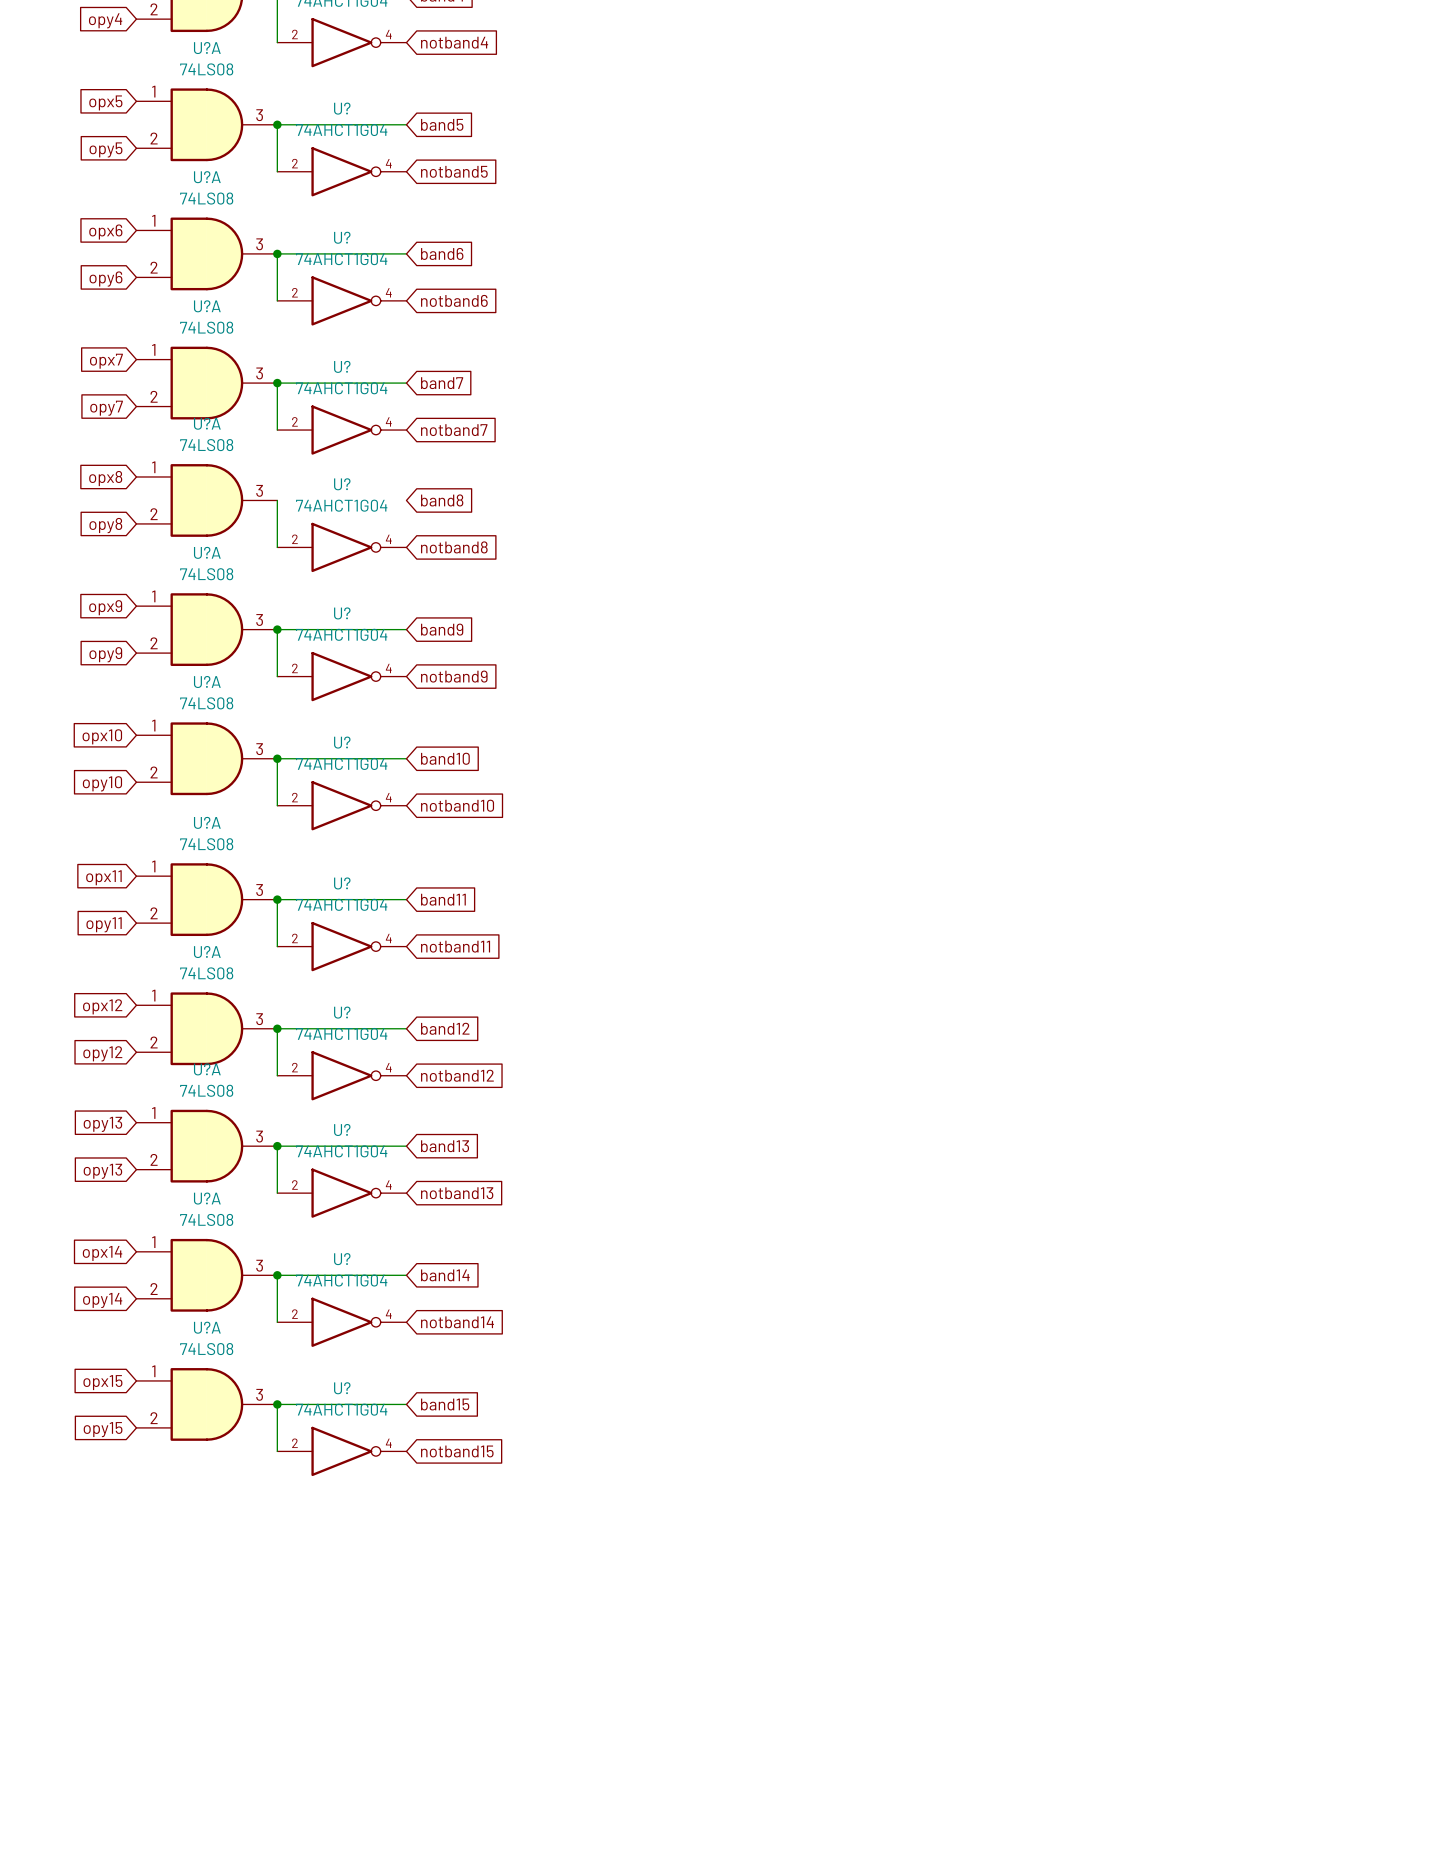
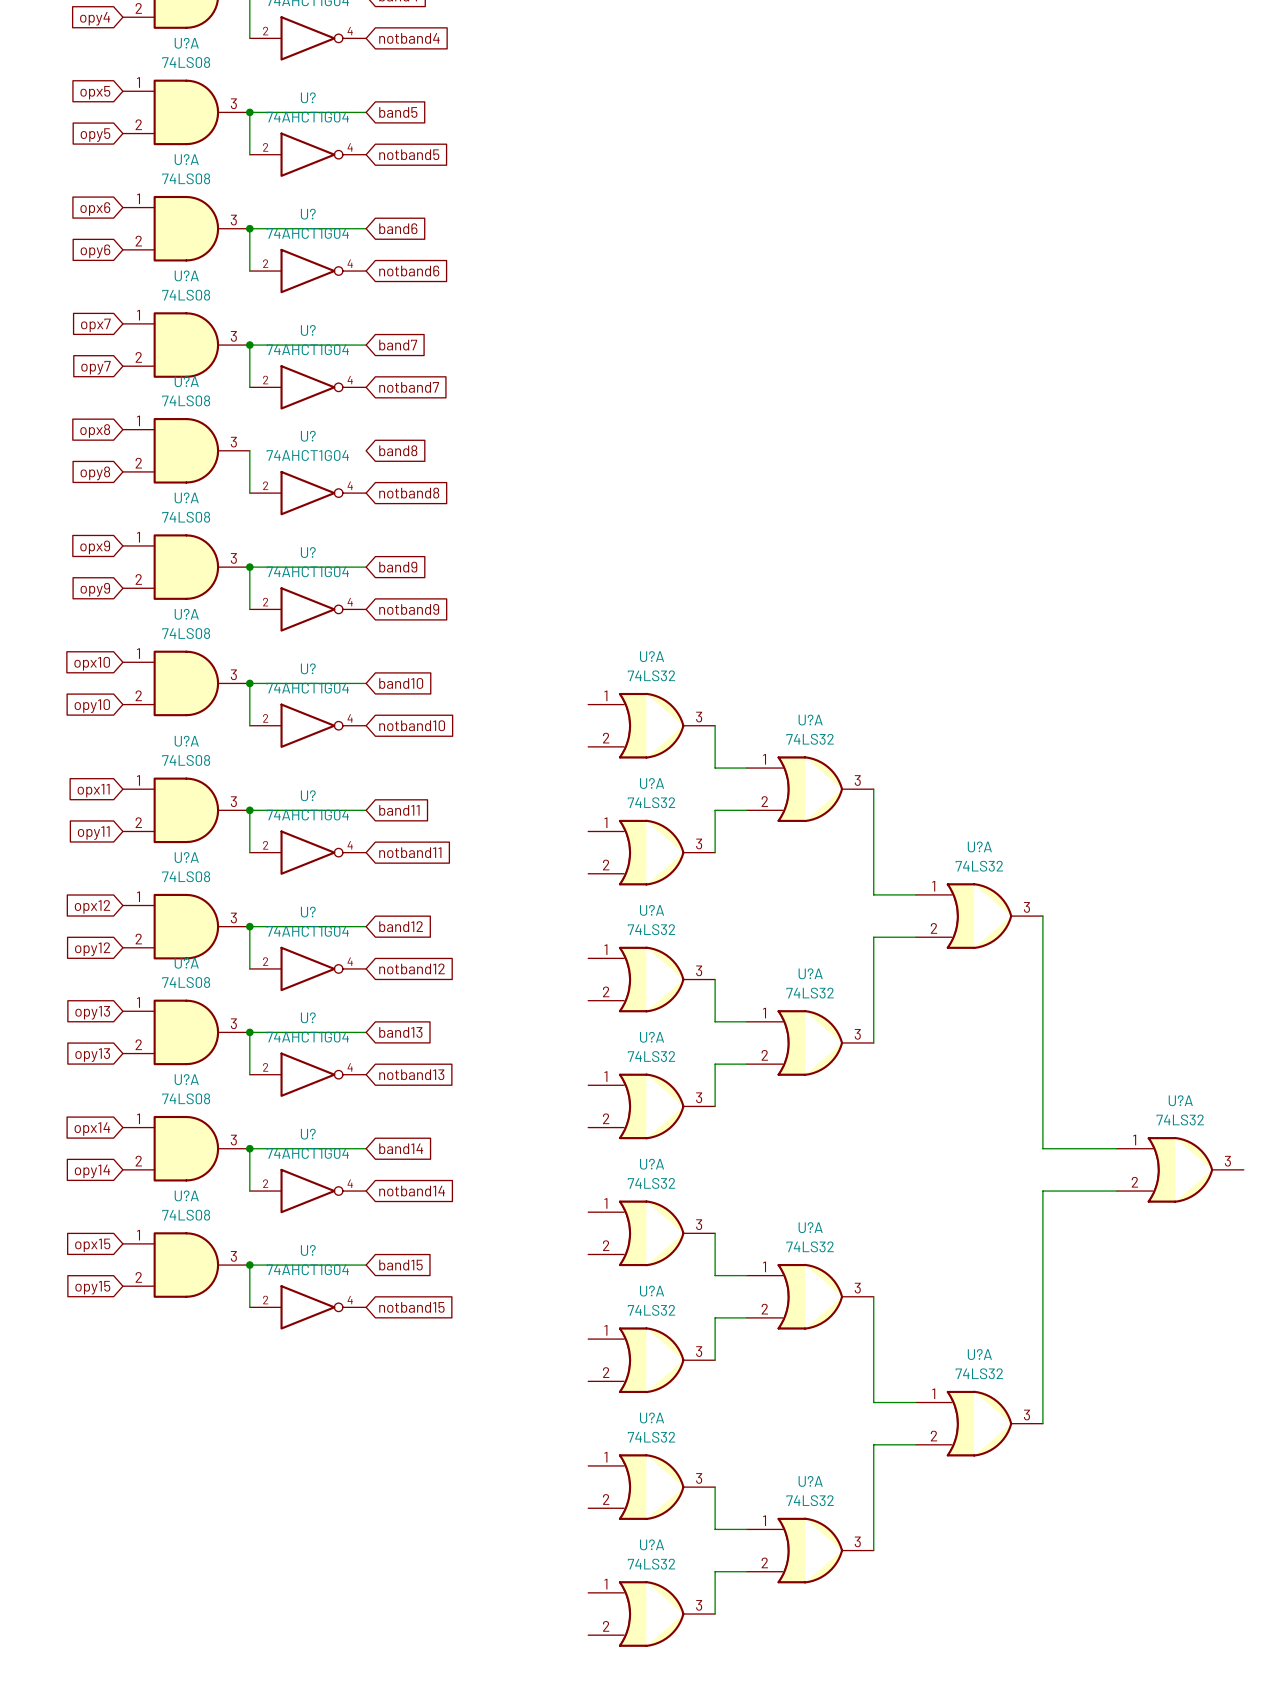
U?A: none -> 74LS32 (651, 725)
wire: none -> (715, 725) (715, 768) (746, 768)
U?A: none -> 74LS32 (810, 789)
wire: none -> (873, 789) (873, 894) (916, 894)
wire: none -> (746, 810) (715, 810) (715, 852)
U?A: none -> 74LS32 (651, 852)
U?A: none -> 74LS32 (979, 916)
wire: none -> (1042, 916) (1042, 1148) (1116, 1148)
wire: none -> (916, 937) (873, 937) (873, 1042)
U?A: none -> 74LS32 (651, 979)
wire: none -> (715, 979) (715, 1021) (746, 1021)
U?A: none -> 74LS32 (810, 1042)
wire: none -> (746, 1064) (715, 1064) (715, 1106)
U?A: none -> 74LS32 (651, 1106)
U?A: none -> 74LS32 (1180, 1169)
wire: none -> (1116, 1191) (1042, 1191) (1042, 1423)
U?A: none -> 74LS32 (651, 1233)
wire: none -> (715, 1233) (715, 1275) (746, 1275)
U?A: none -> 74LS32 (810, 1296)
wire: none -> (873, 1296) (873, 1402) (916, 1402)
wire: none -> (746, 1317) (715, 1317) (715, 1360)
U?A: none -> 74LS32 (651, 1360)
U?A: none -> 74LS32 (979, 1423)
wire: none -> (916, 1444) (873, 1444) (873, 1550)
U?A: none -> 74LS32 (651, 1487)
wire: none -> (715, 1487) (715, 1529) (746, 1529)
U?A: none -> 74LS32 (810, 1550)
wire: none -> (746, 1571) (715, 1571) (715, 1614)
U?A: none -> 74LS32 (651, 1614)

